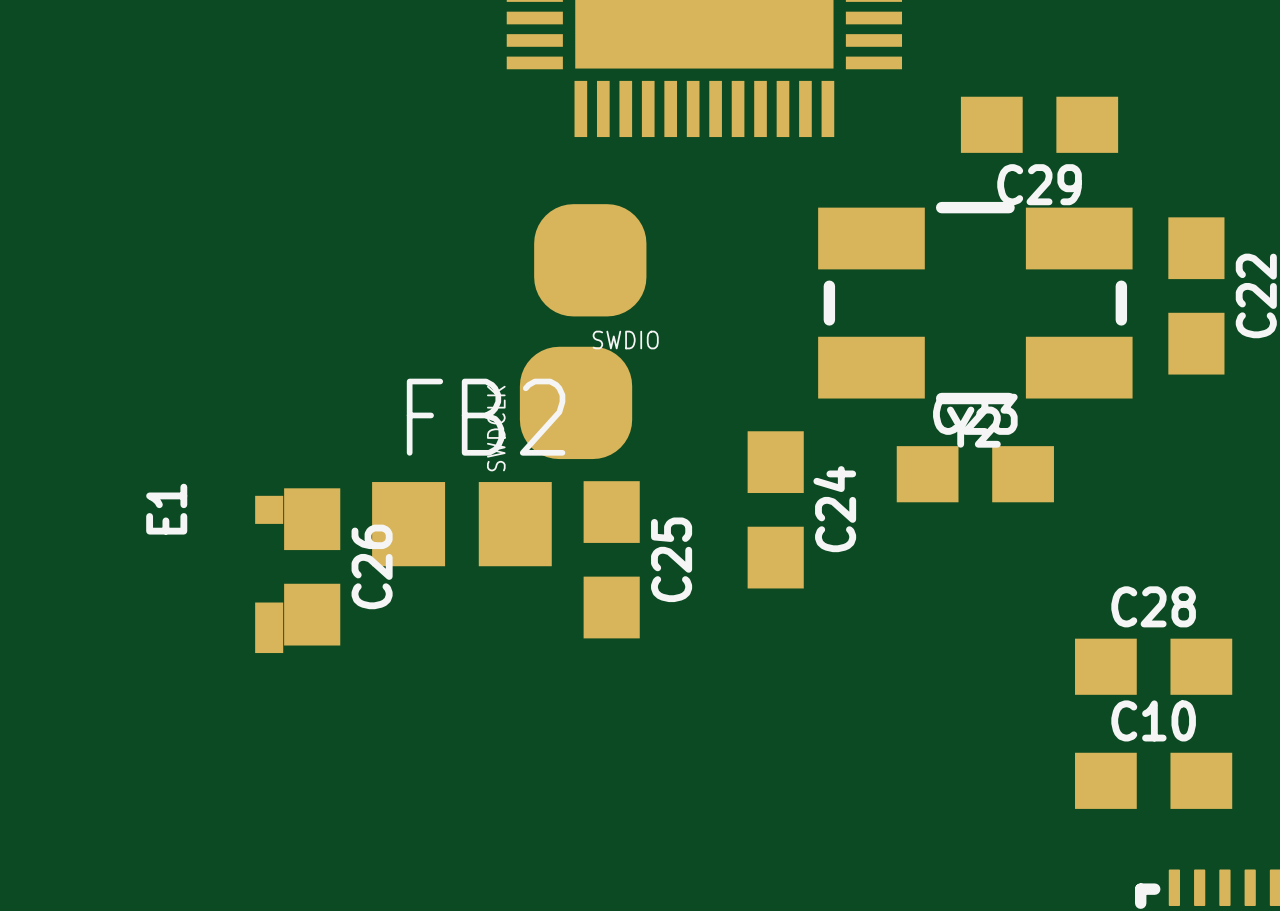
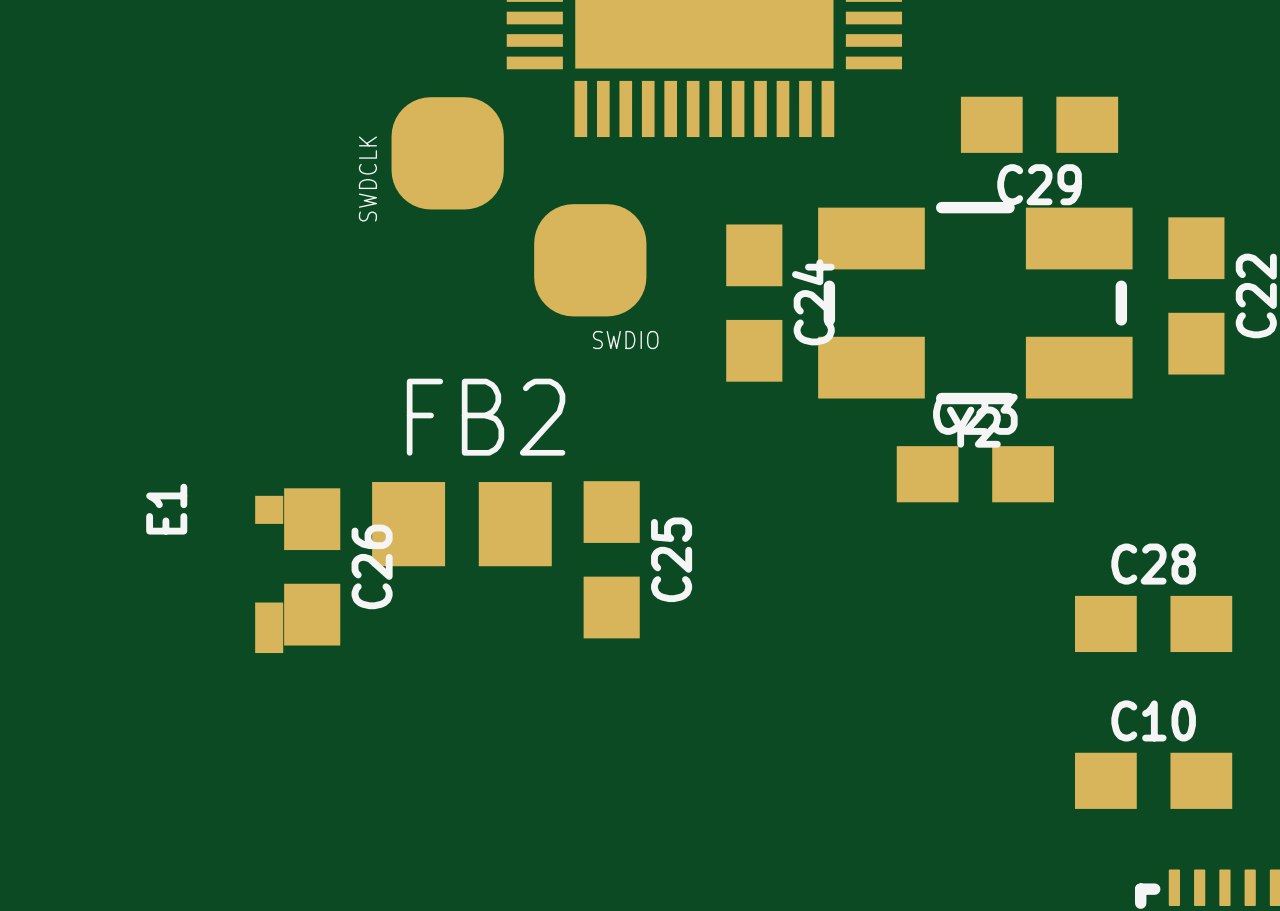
SWDCLK position: (576, 402) -> (447, 153)
C24 position: (775, 509) -> (754, 303)
C28 position: (1153, 666) -> (1153, 623)

